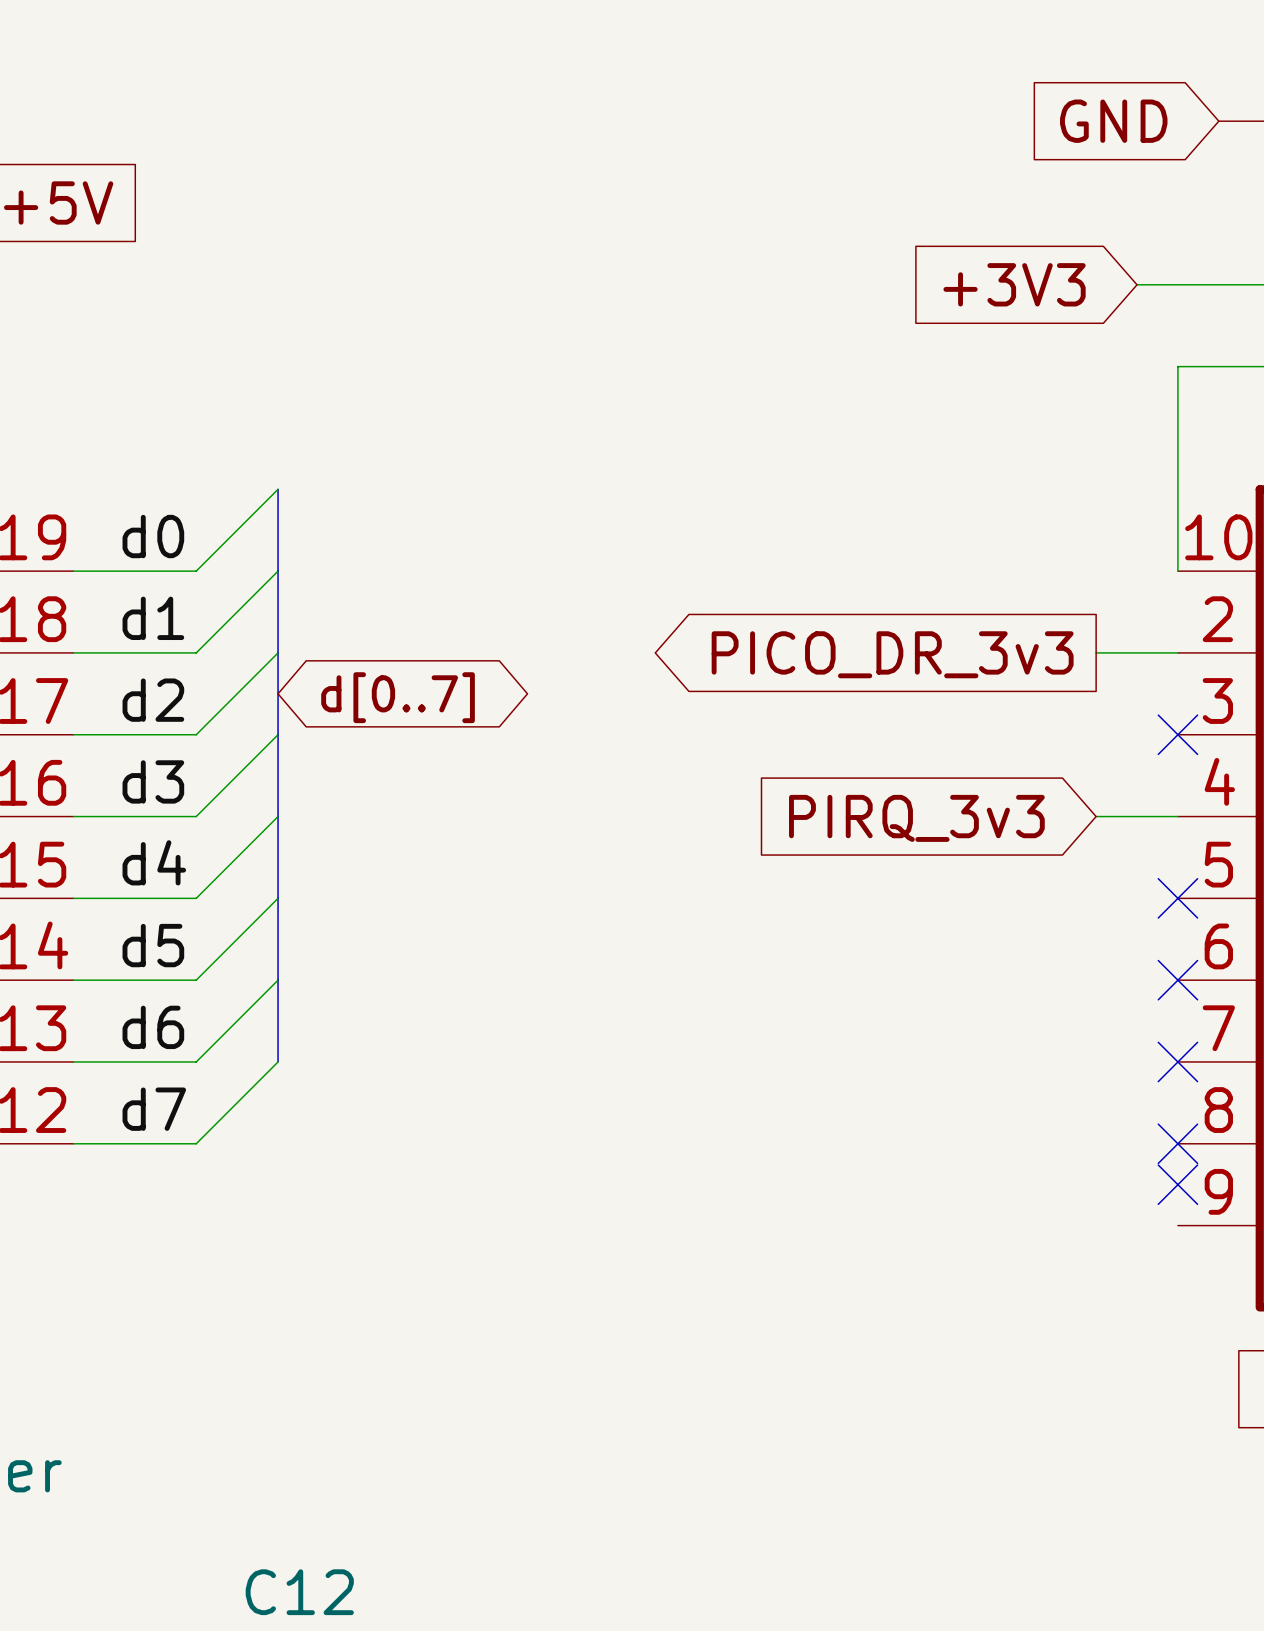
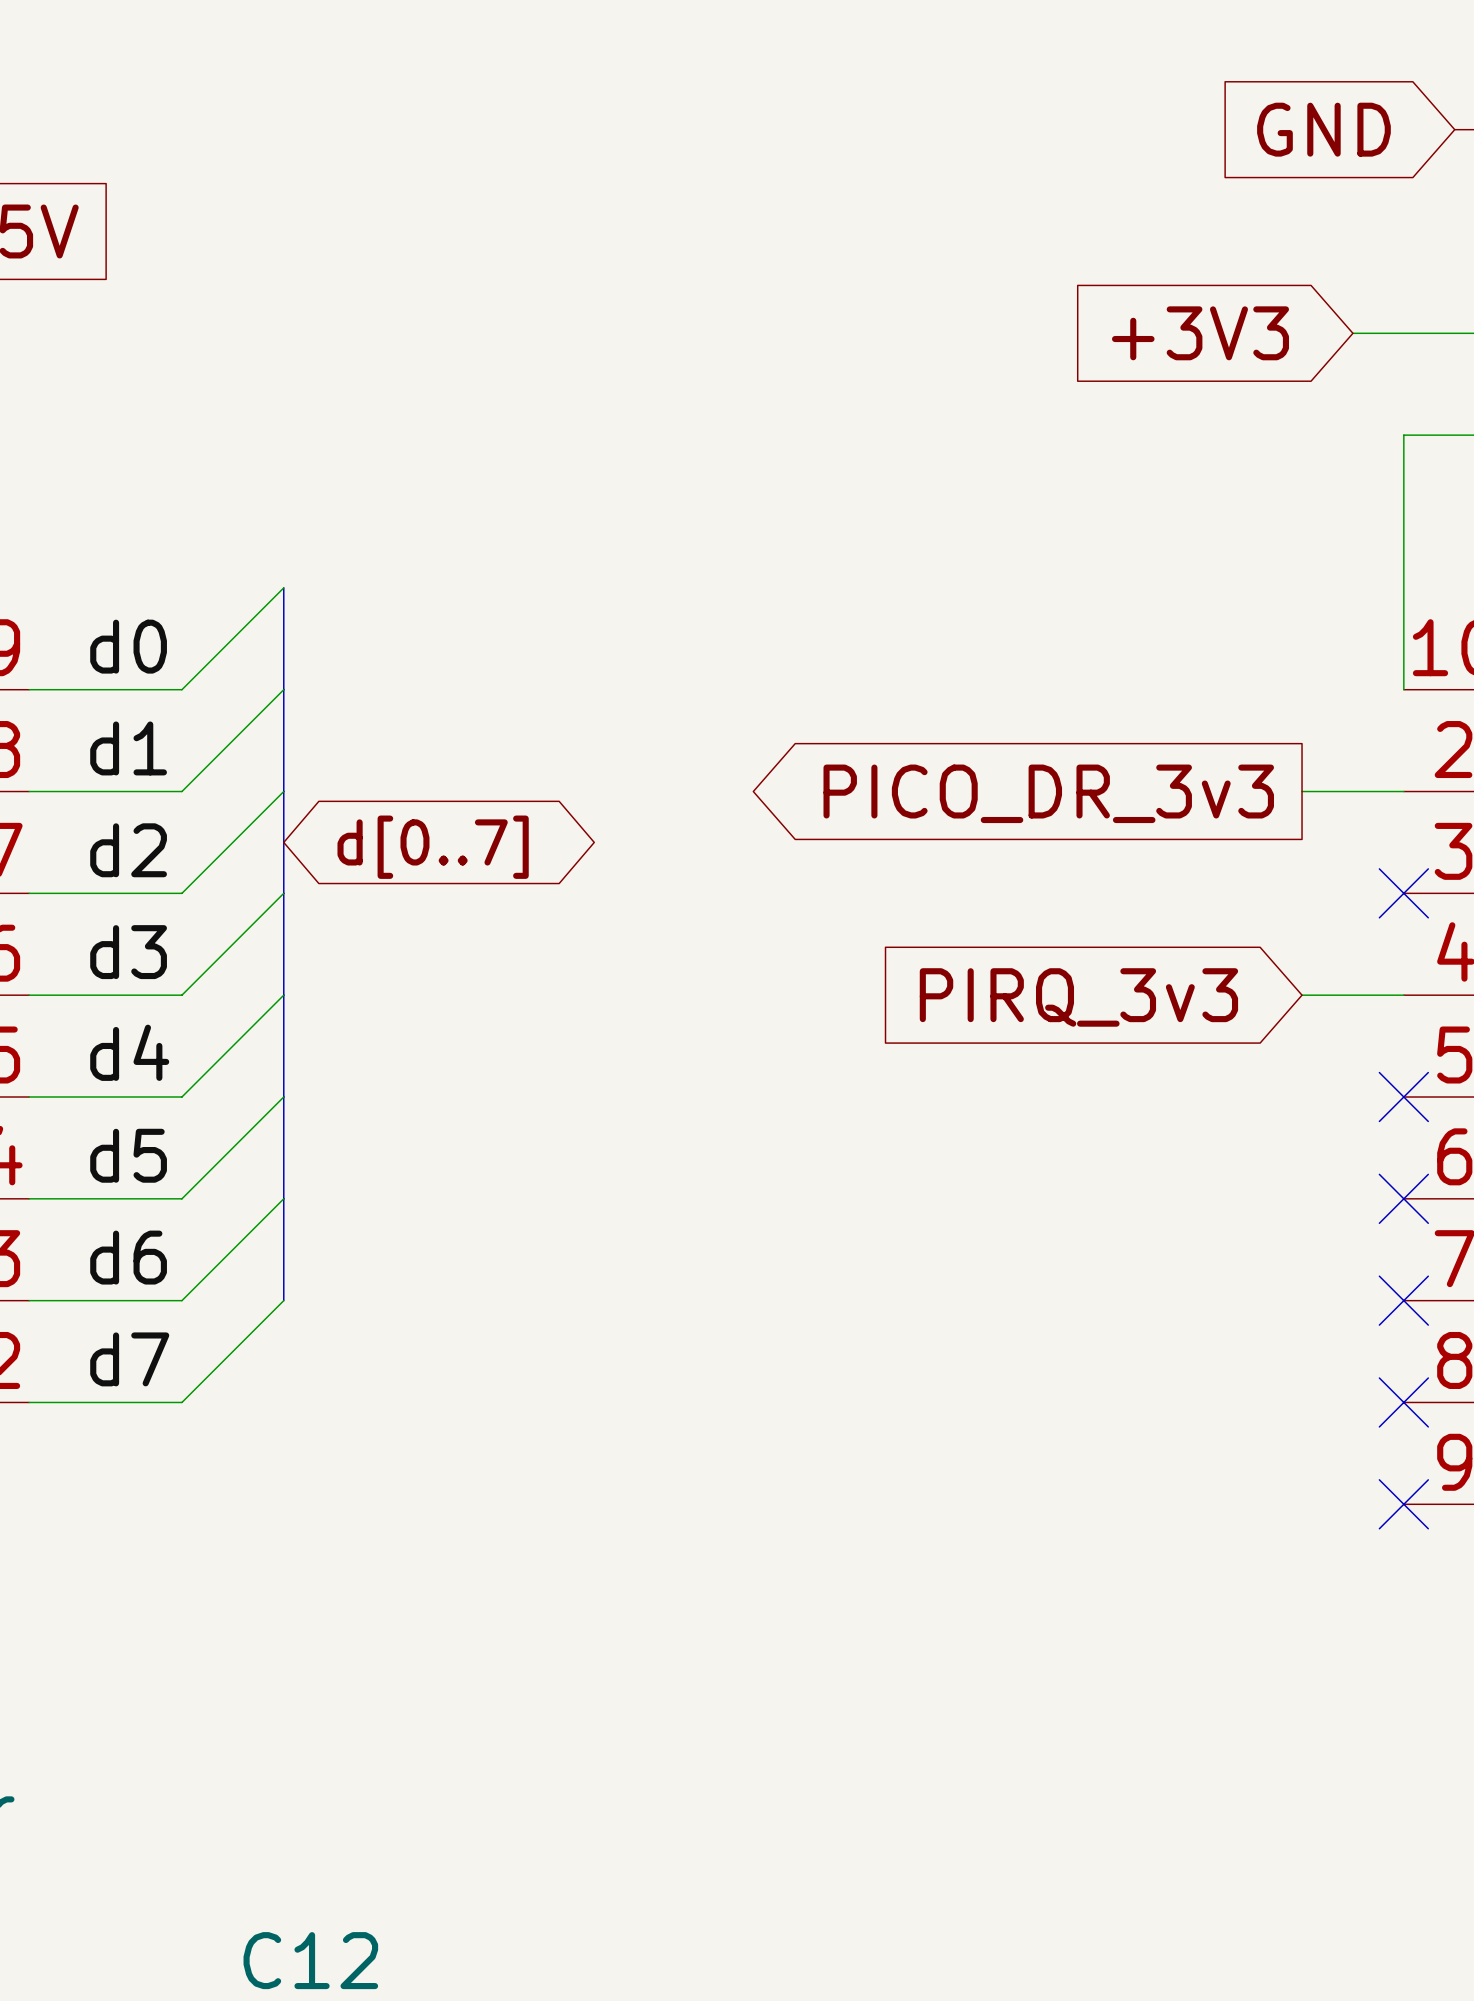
no-connect mark position: (1177, 1184) -> (1403, 1504)

